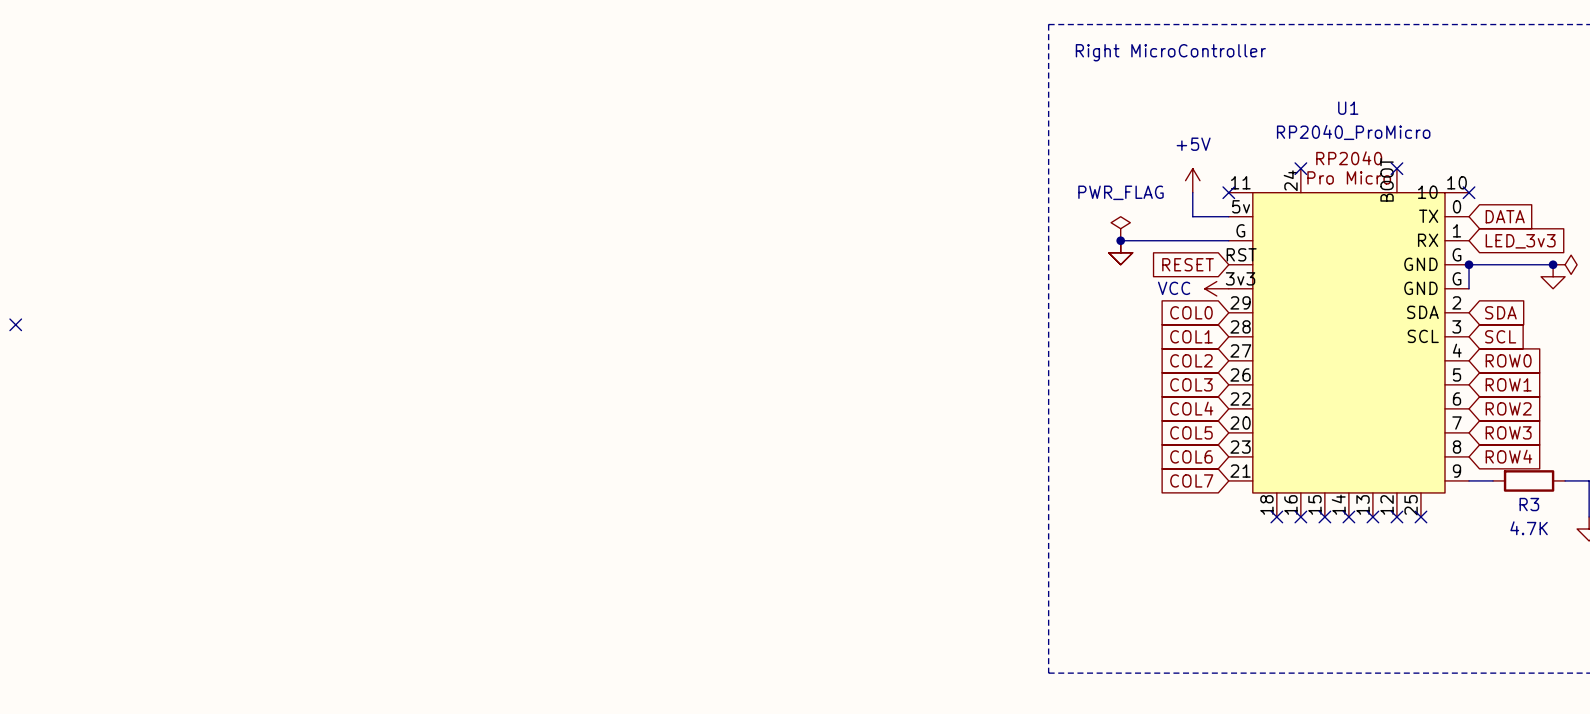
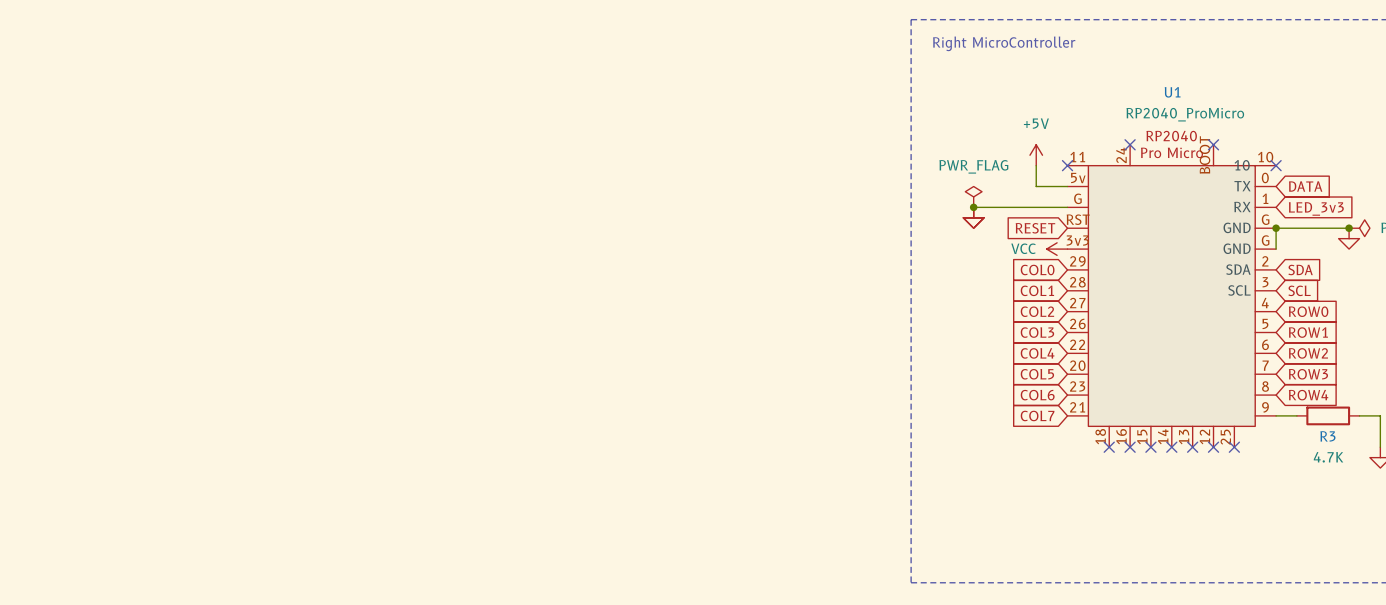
no-connect mark: (15, 324) -> none

